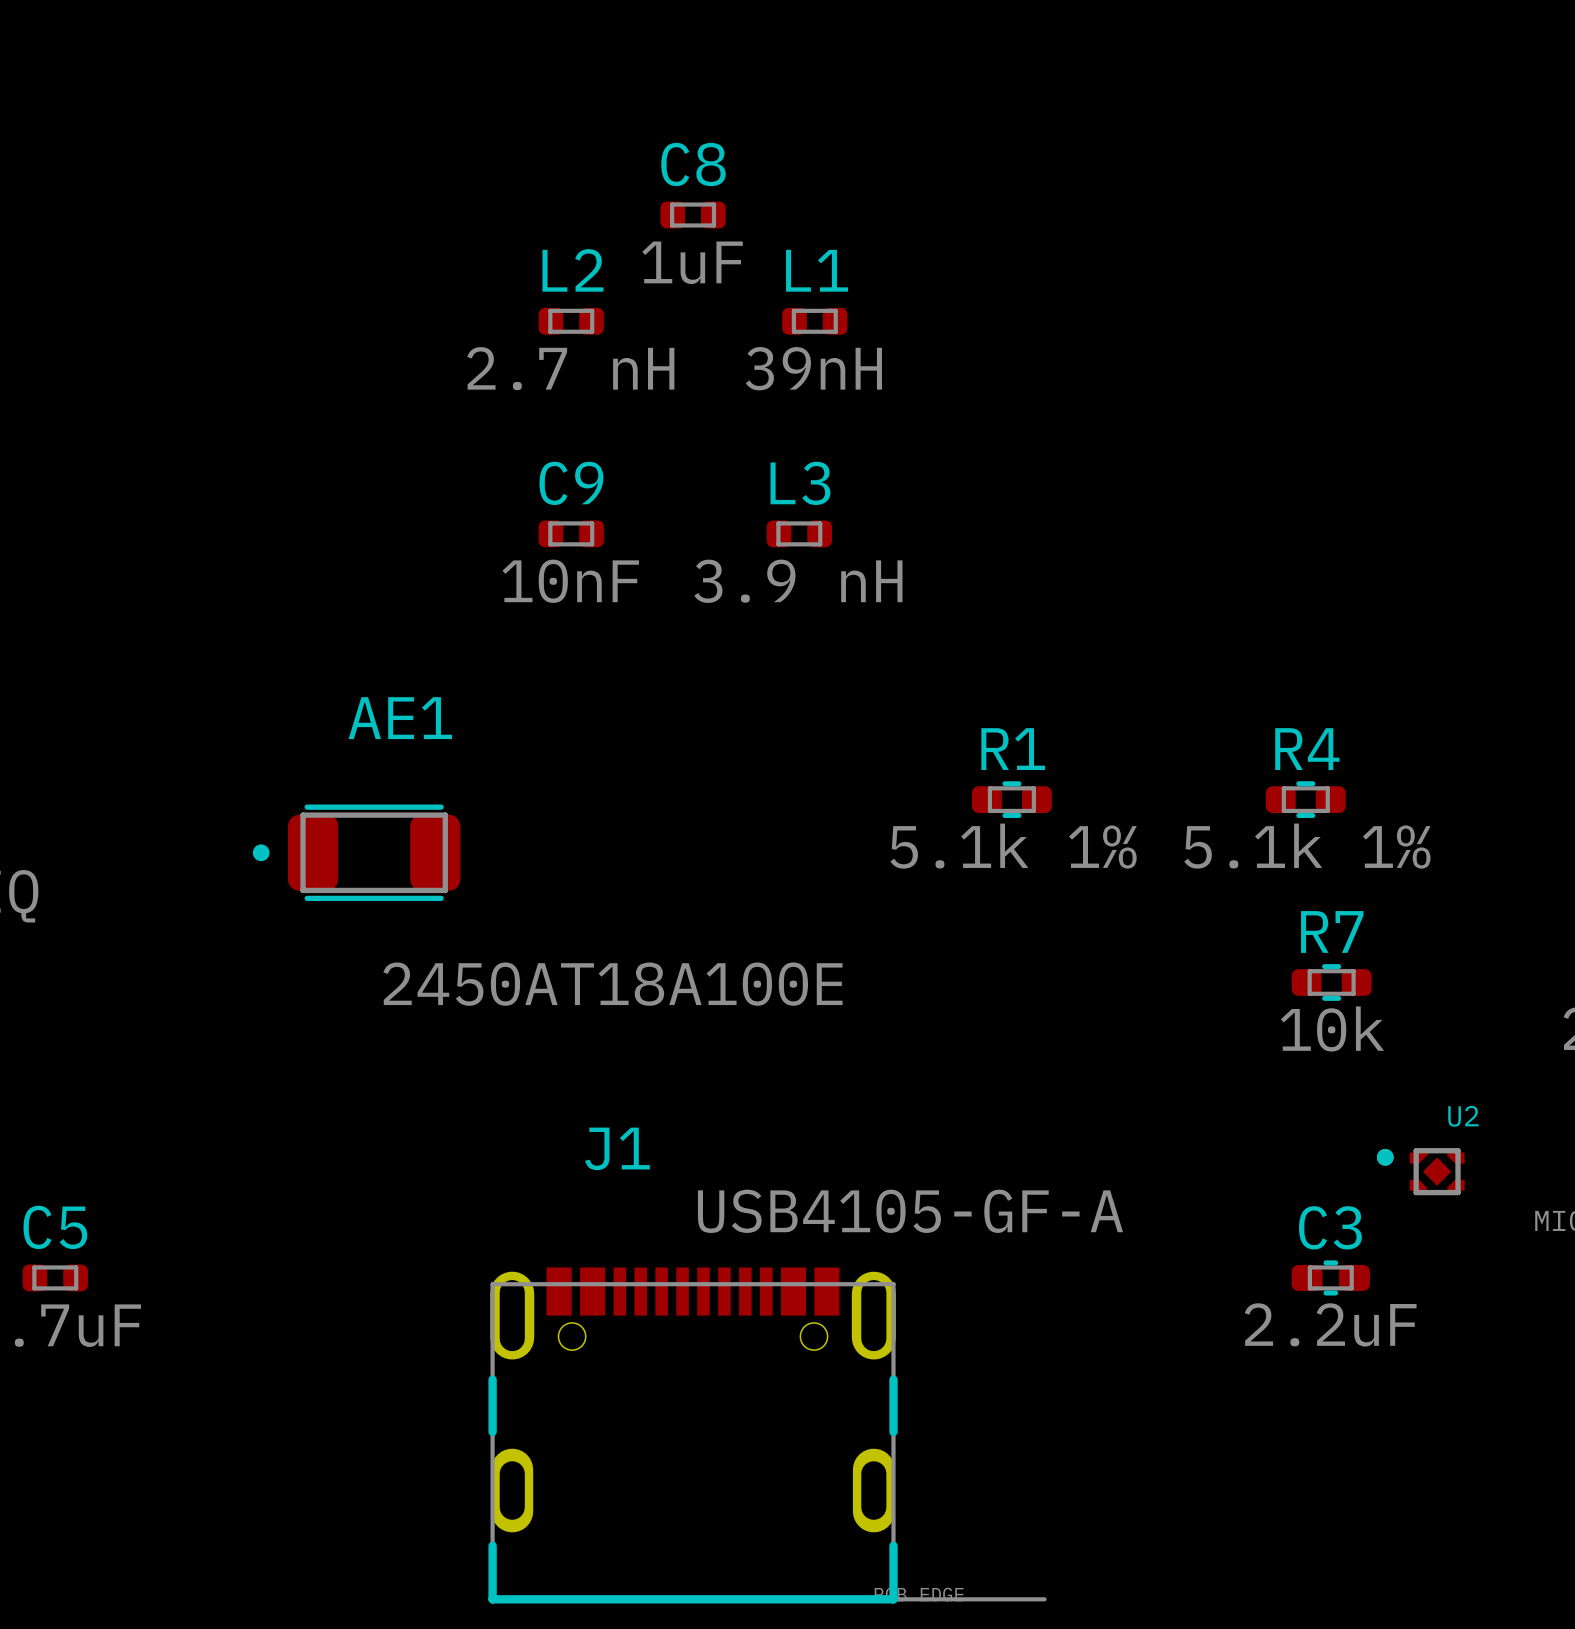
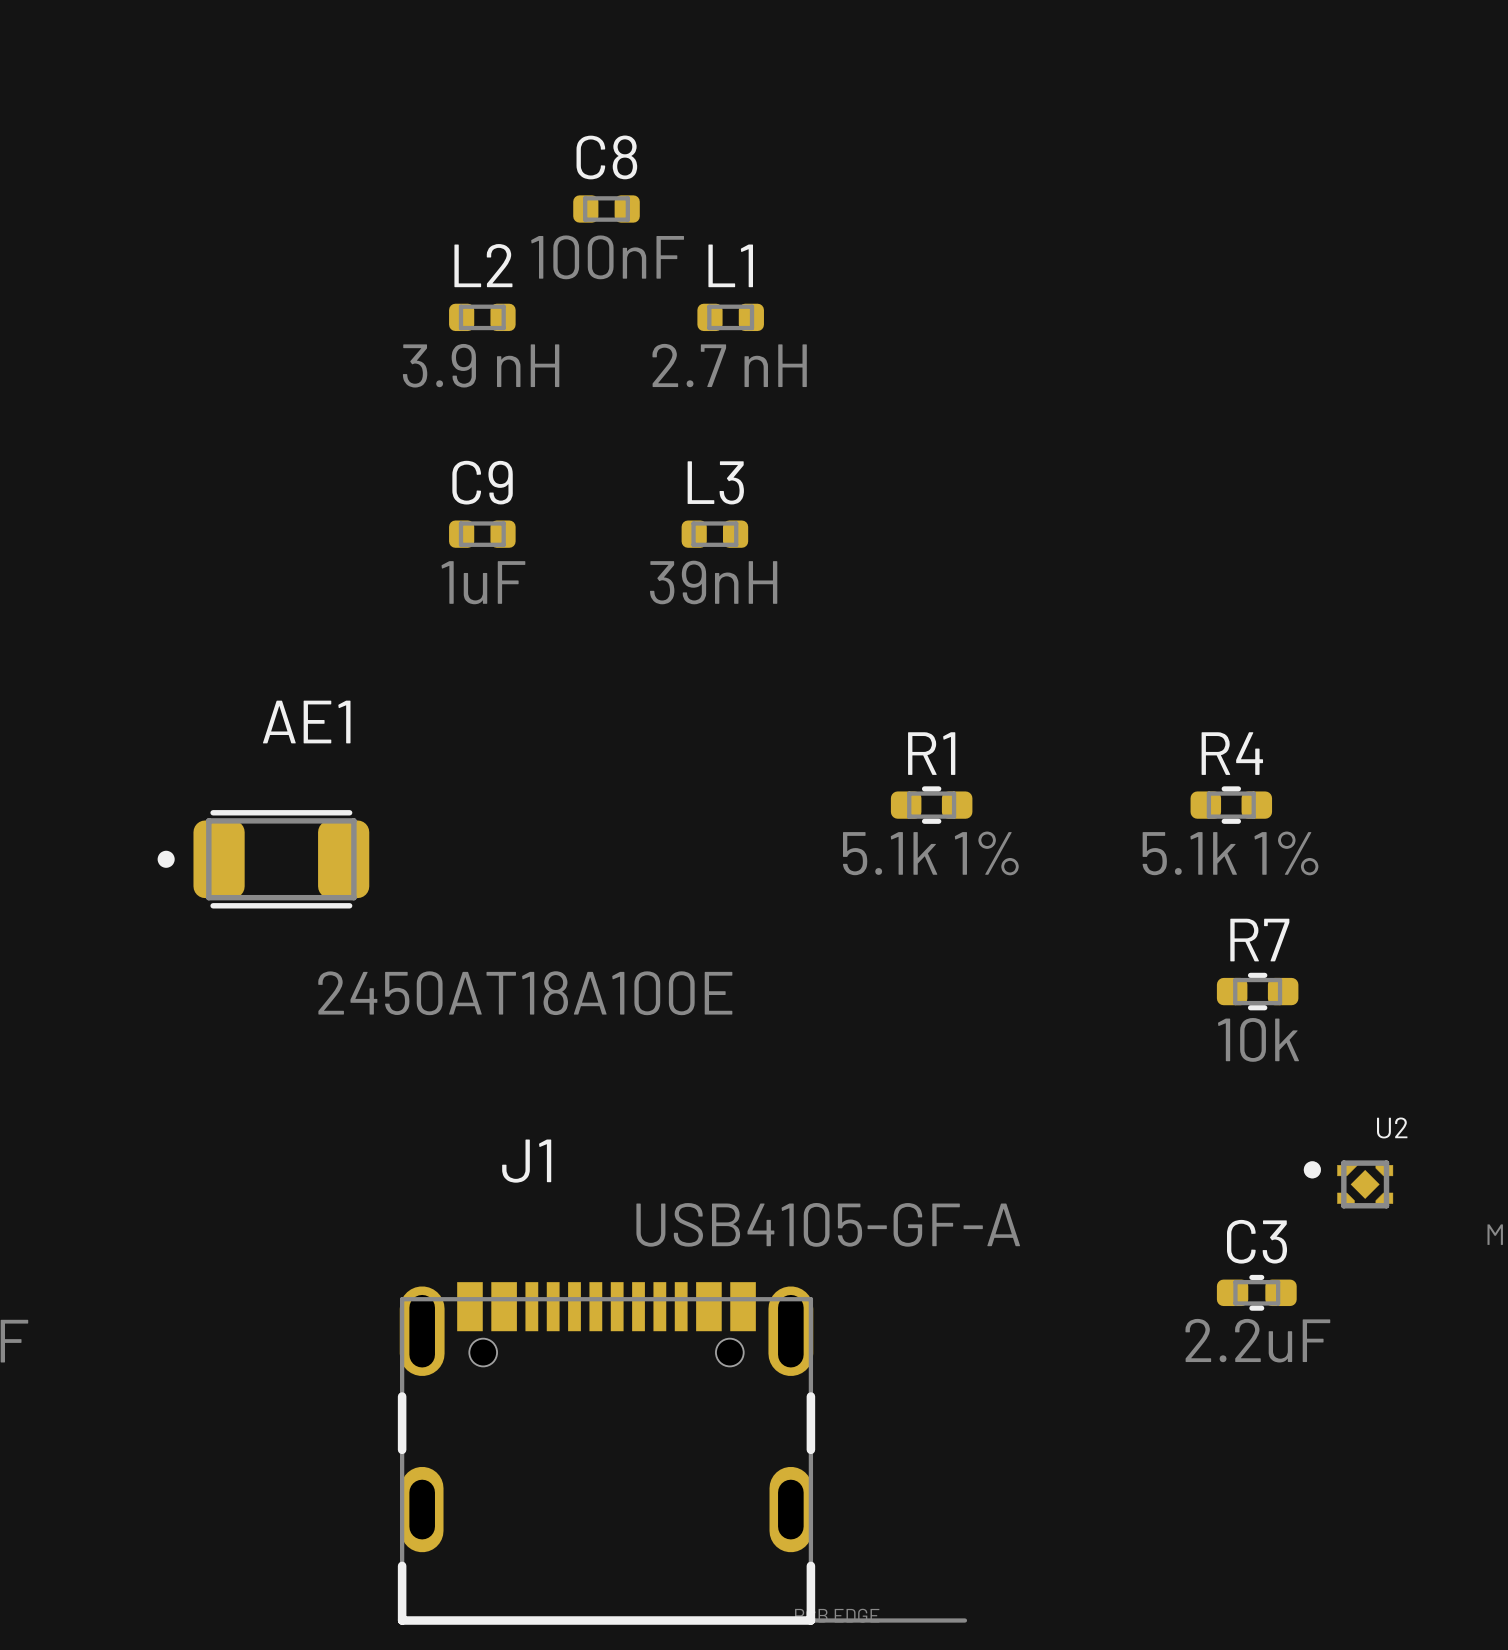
C8 value: 1uF (692, 262) -> 100nF (607, 257)
L2 value: 2.7 nH (570, 368) -> 3.9 nH (481, 365)
L1 value: 39nH (813, 368) -> 2.7 nH (729, 365)
C9 value: 10nF (570, 581) -> 1uF (483, 582)
L3 value: 3.9 nH (798, 581) -> 39nH (713, 582)

